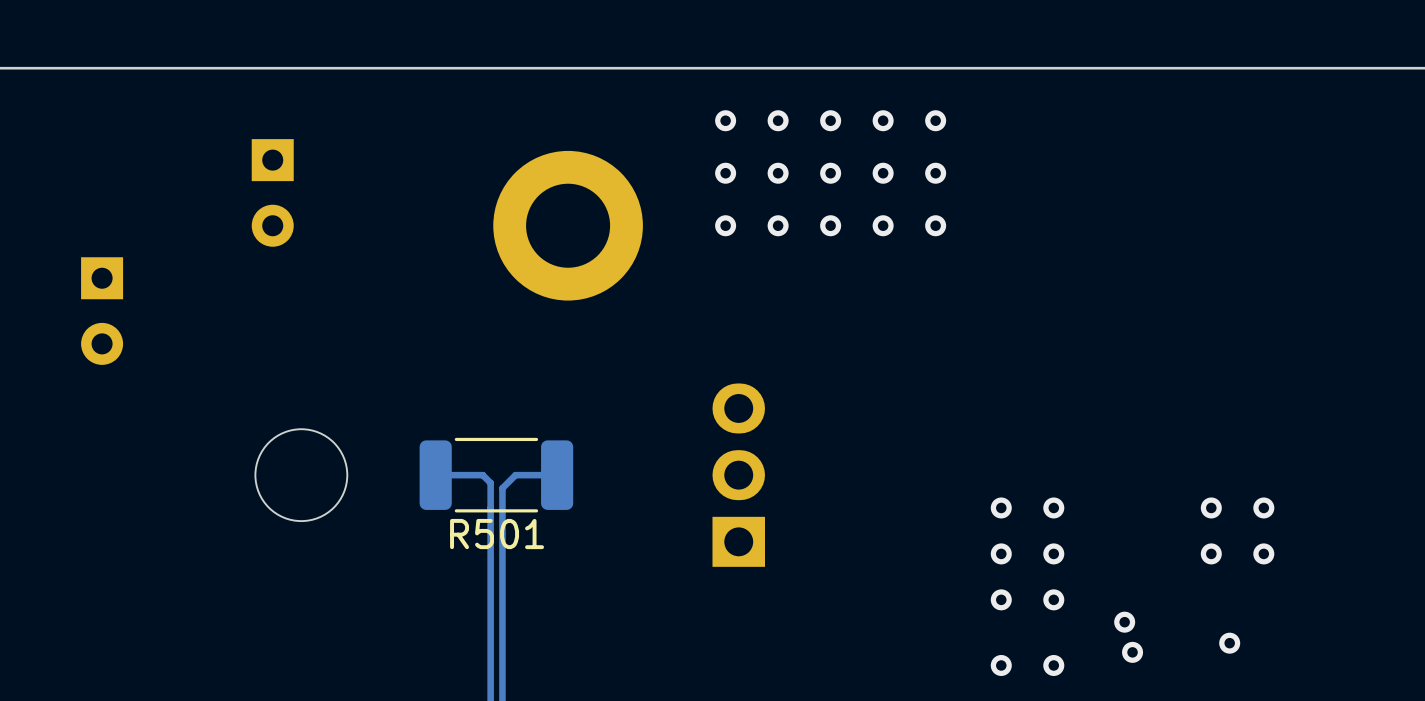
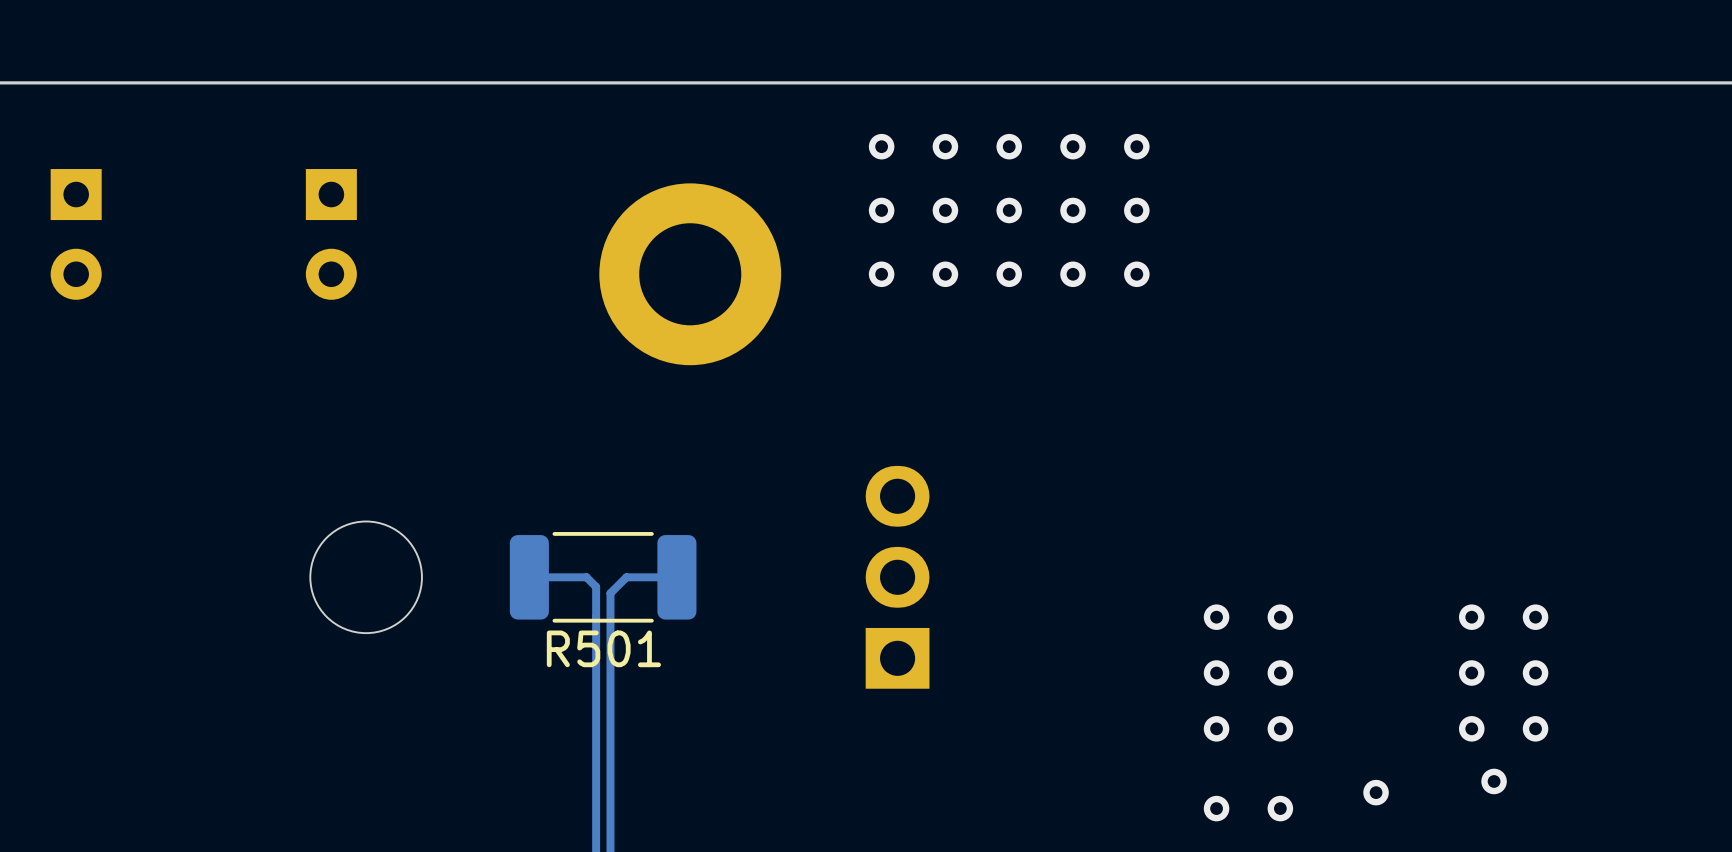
part position: (102, 311) -> (76, 234)
via: none -> (1471, 728)
via: none -> (1535, 728)
via: (1124, 622) -> none

